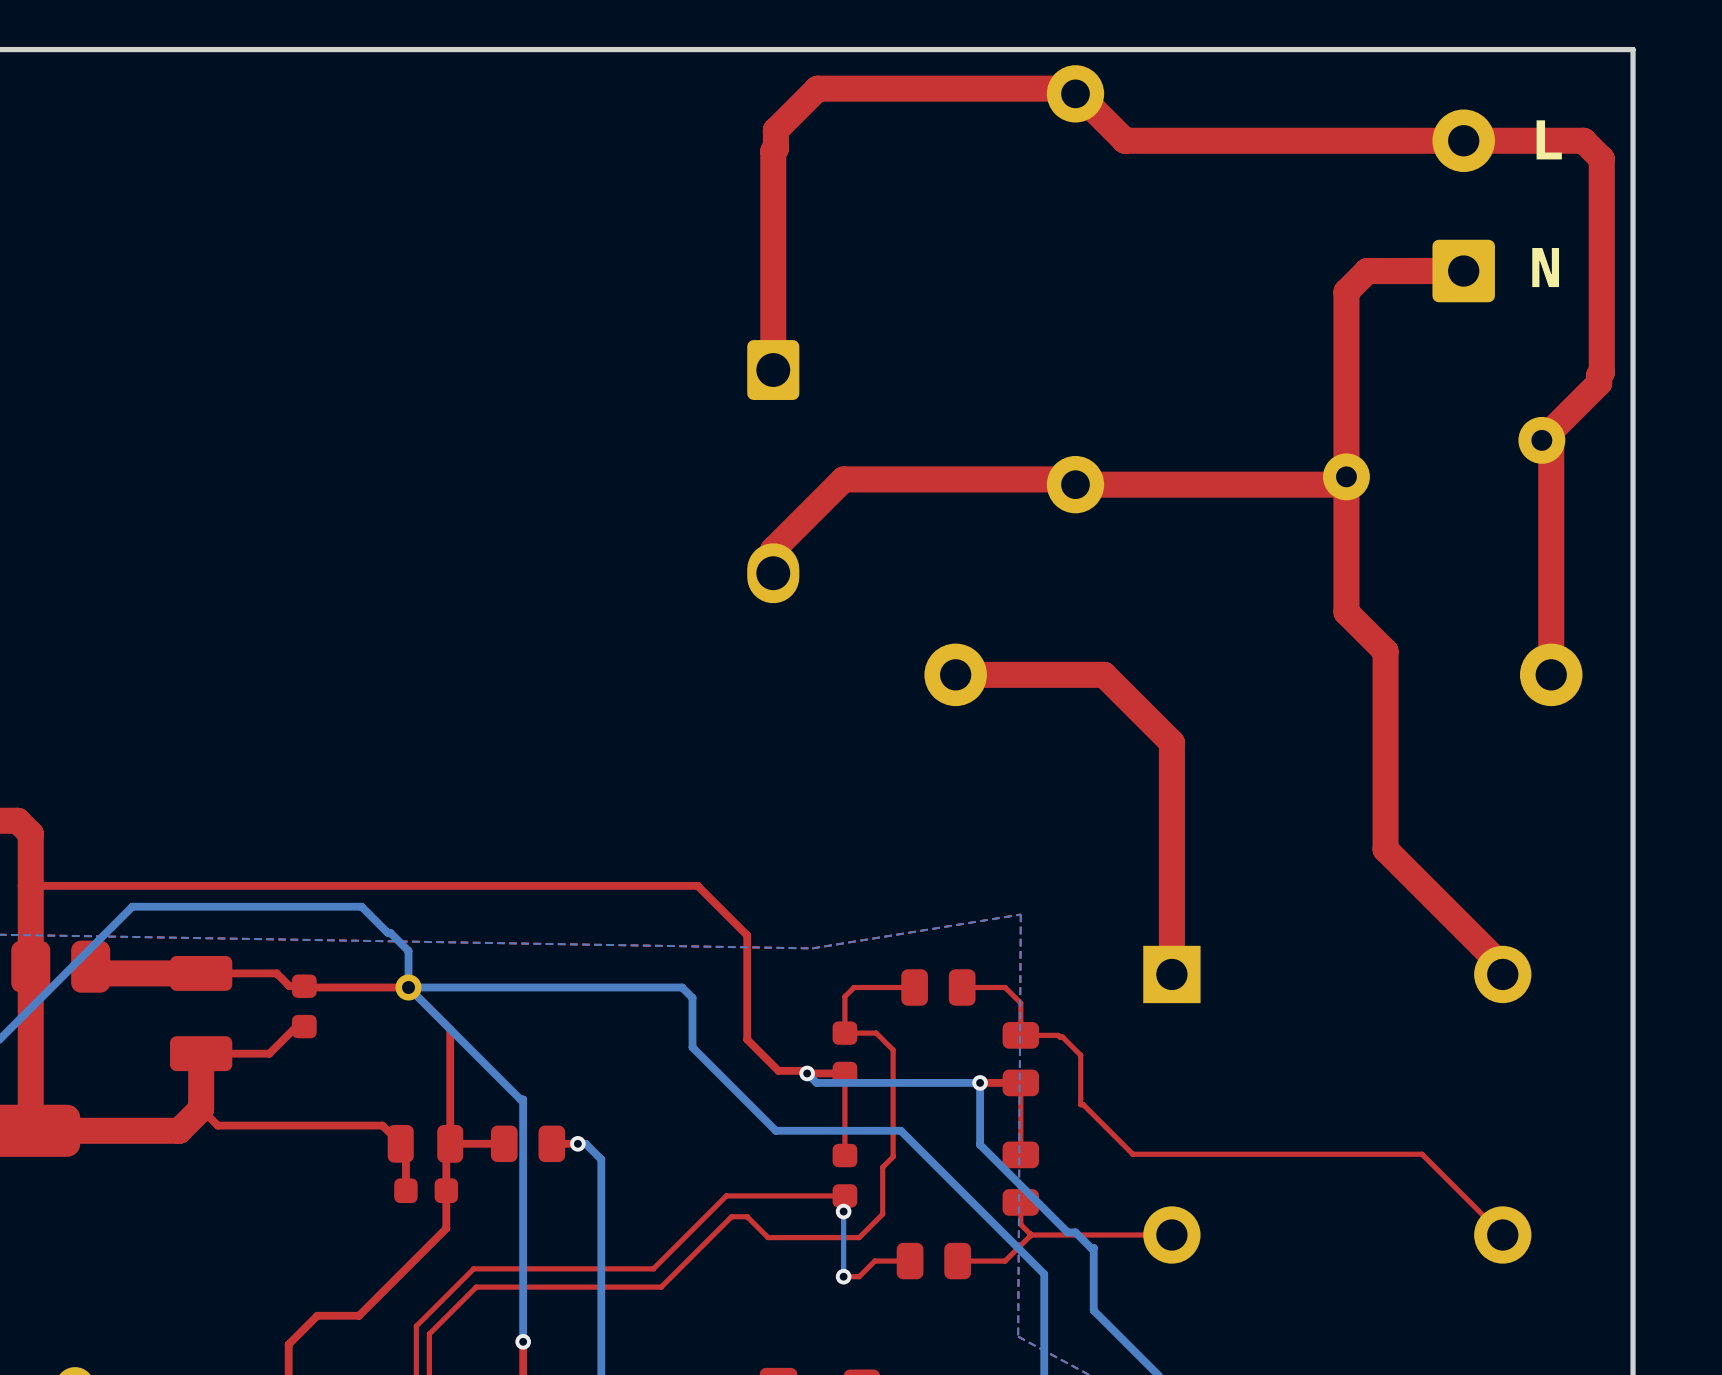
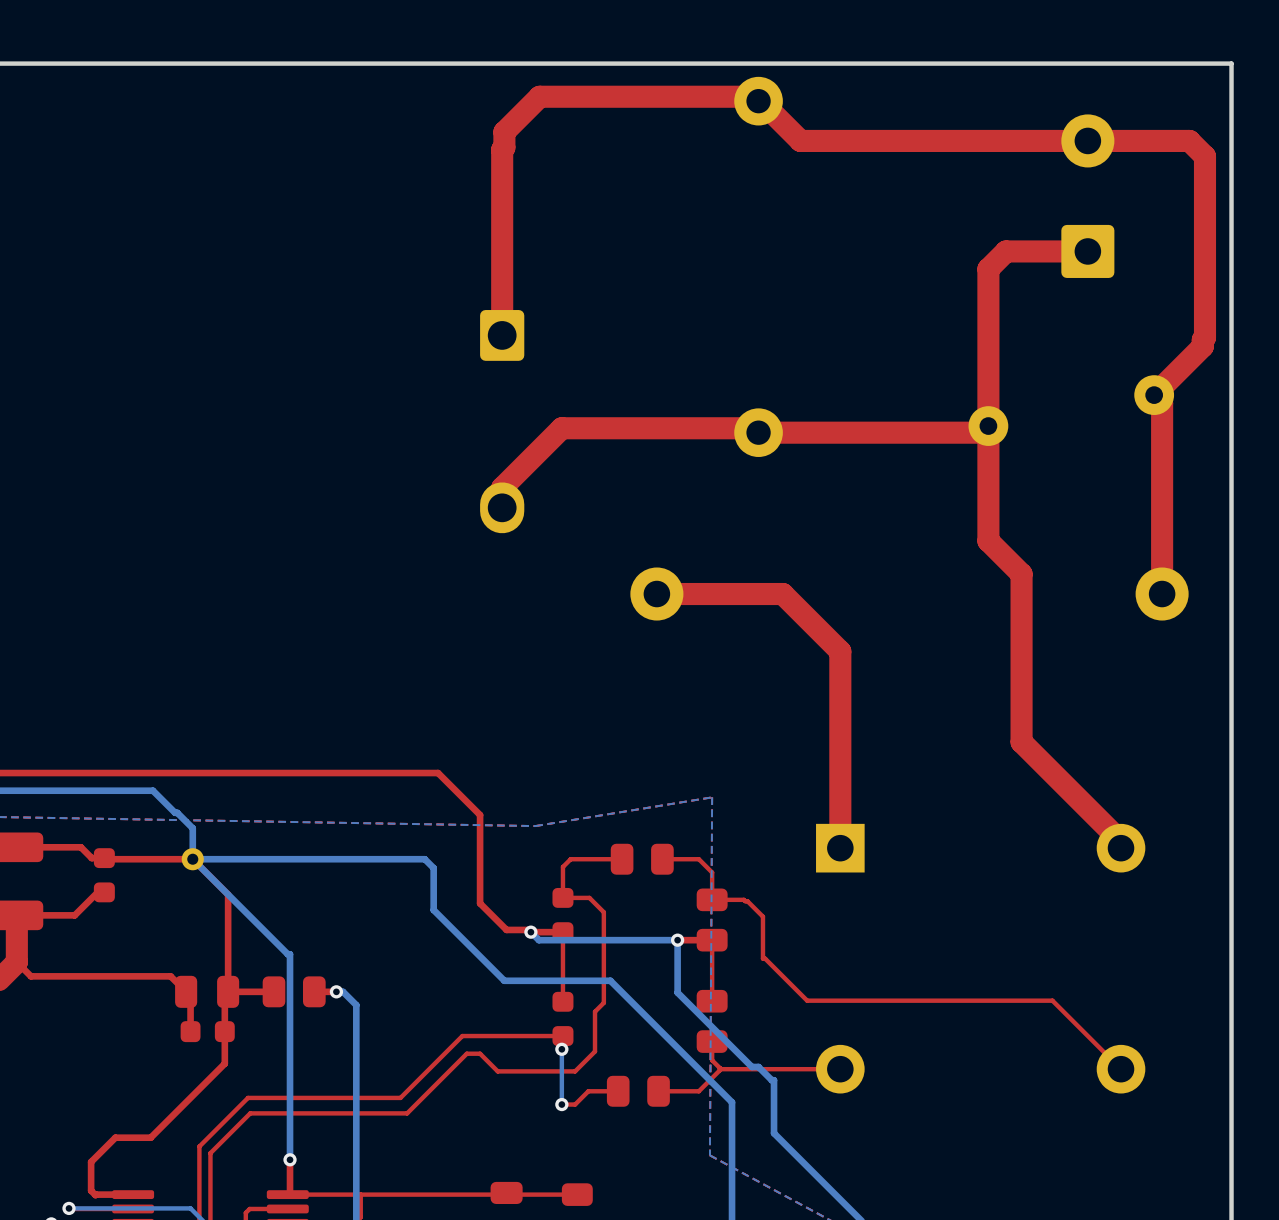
text: L (1549, 139) -> none
text: N (1545, 267) -> none

